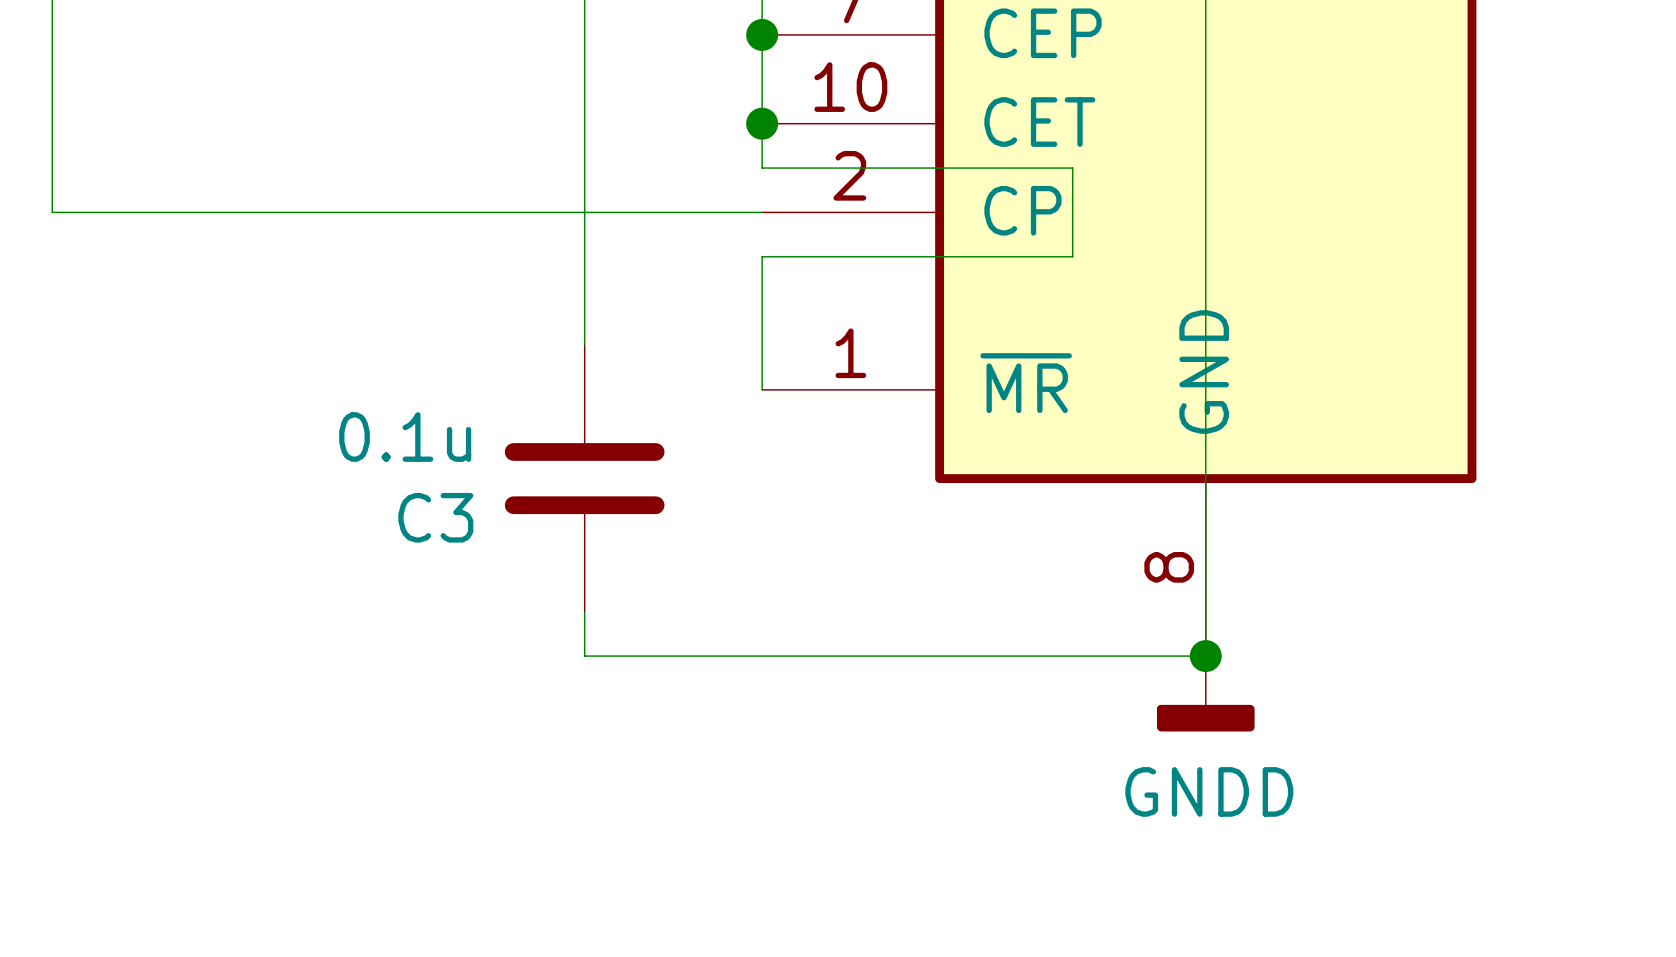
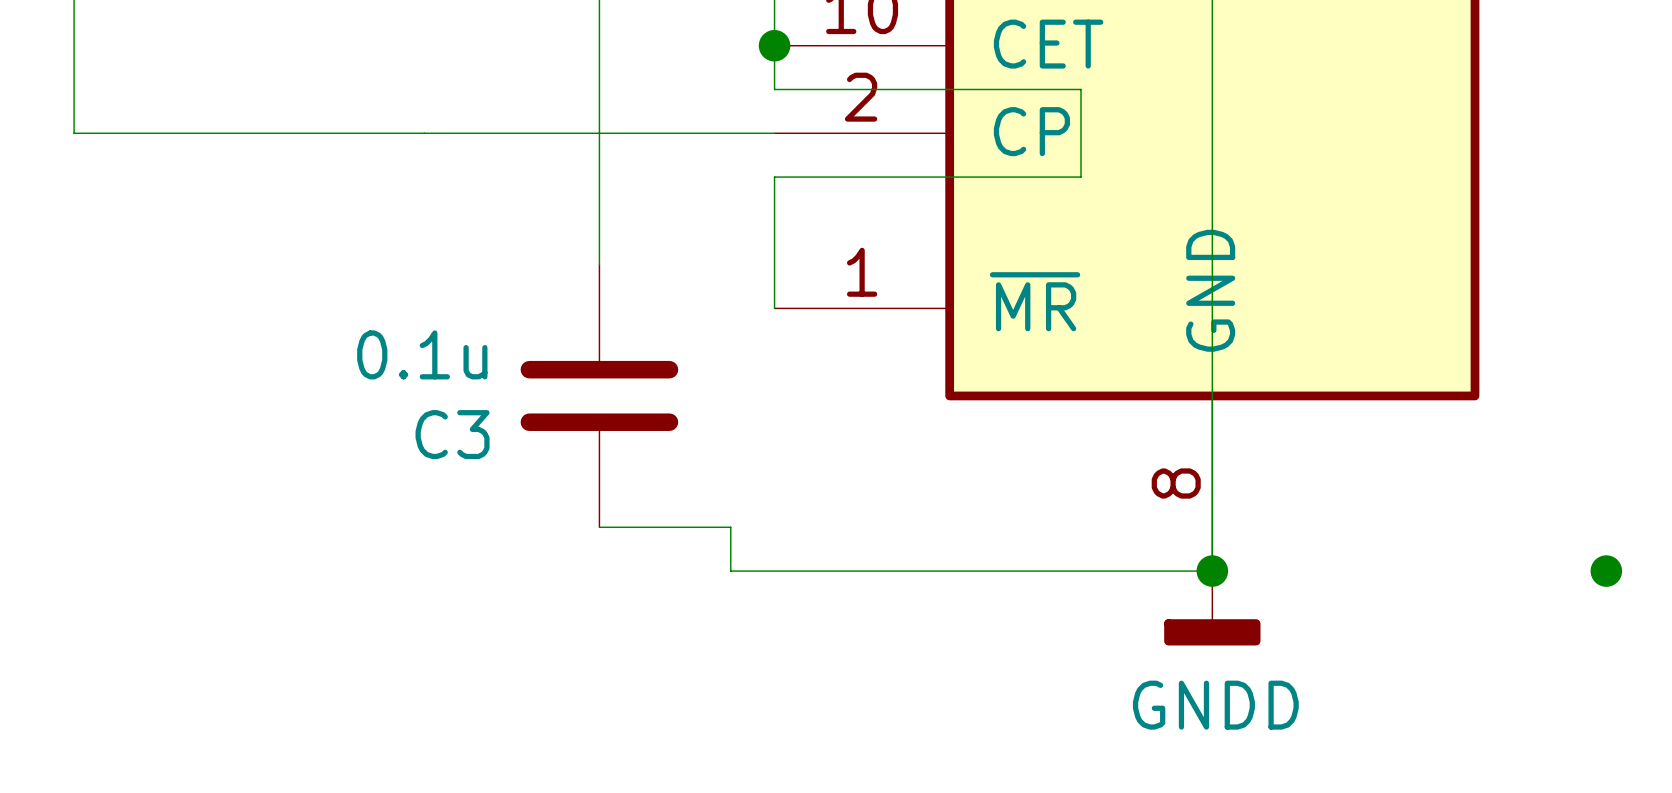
wire: (584, 611) (584, 656) (717, 656) -> (599, 527) (730, 527) (730, 571)
junction: none -> (1606, 571)

